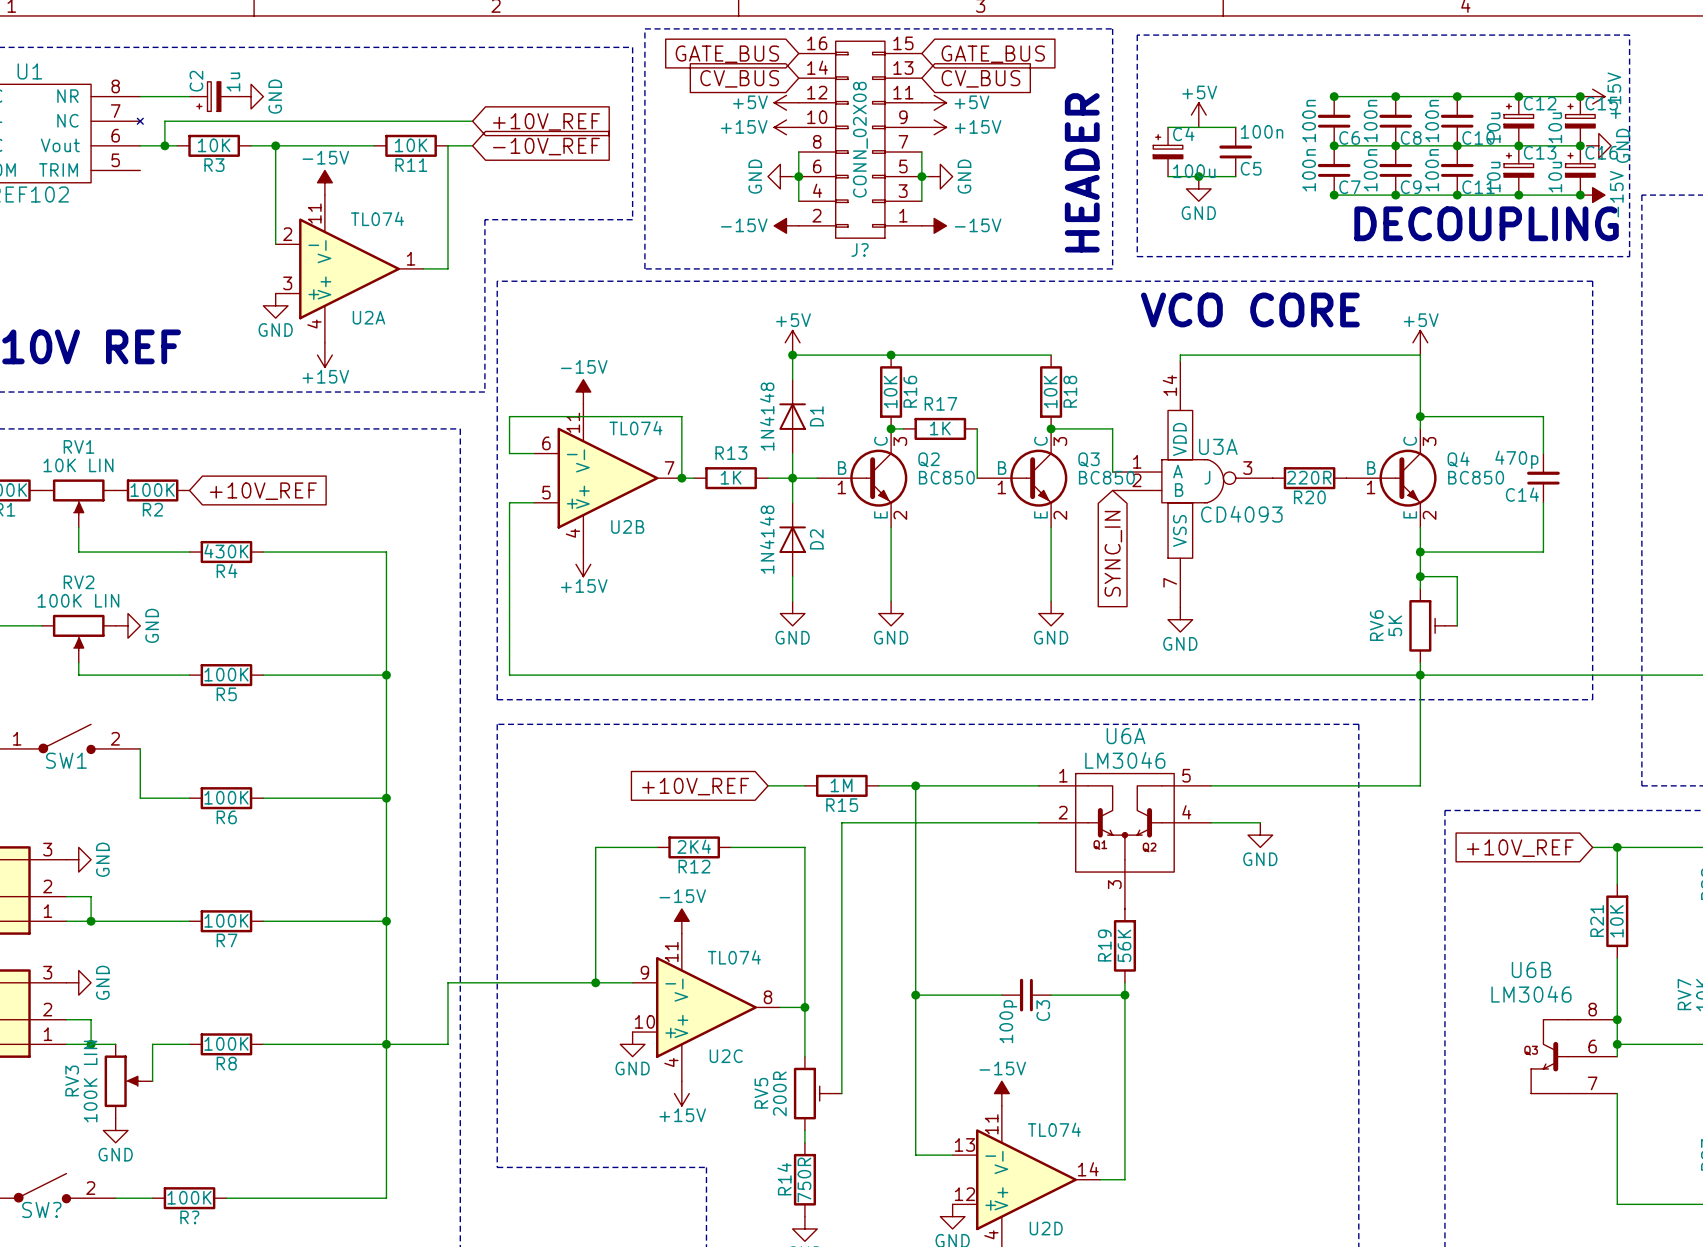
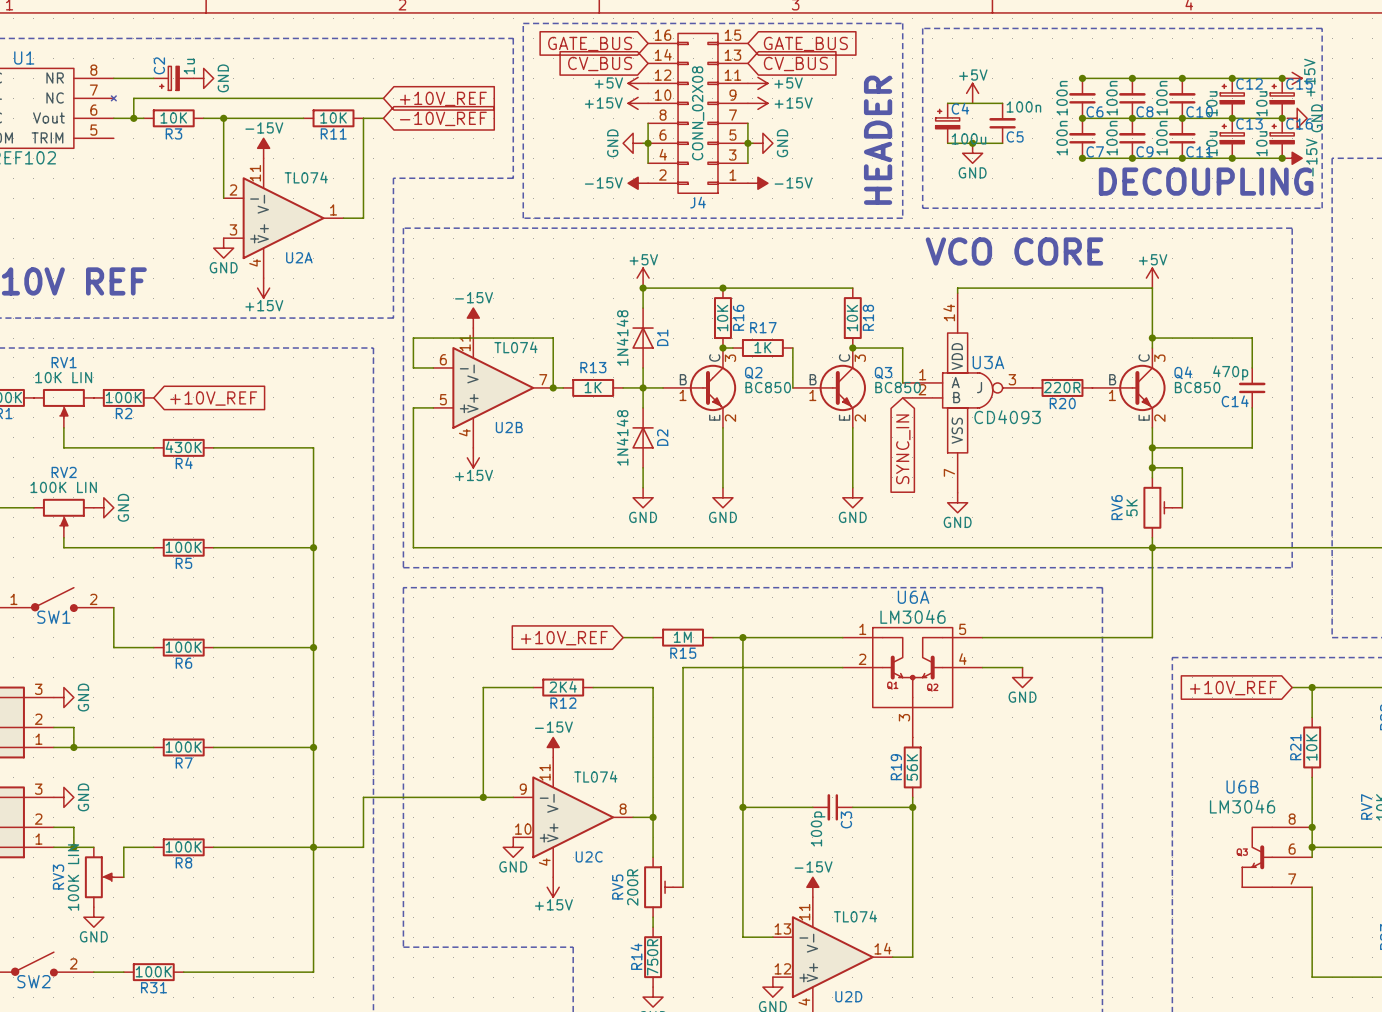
J? name: J? (860, 250) -> J4 (698, 202)
SW? name: SW? (41, 1209) -> SW2 (33, 981)
R? name: R? (189, 1217) -> R31 (154, 987)

